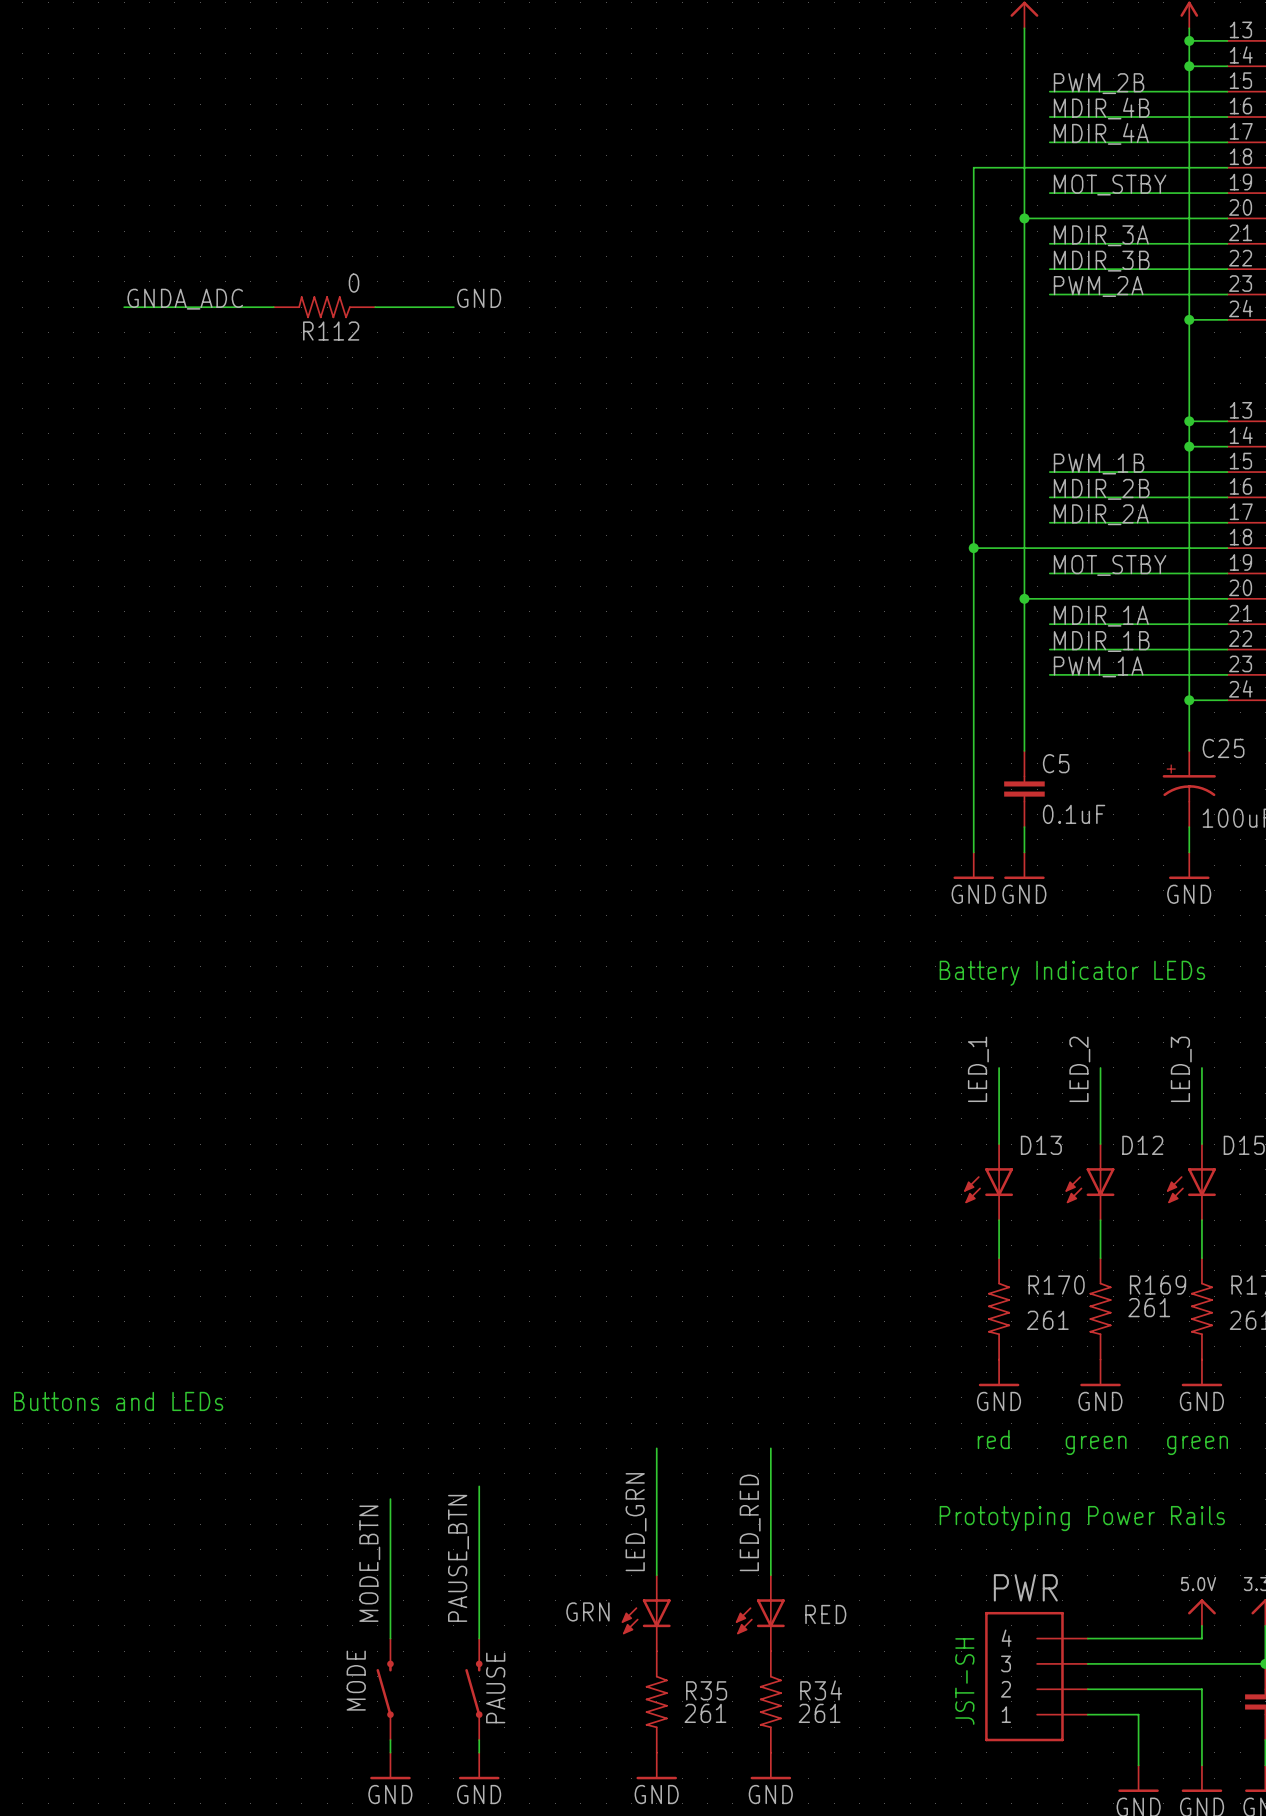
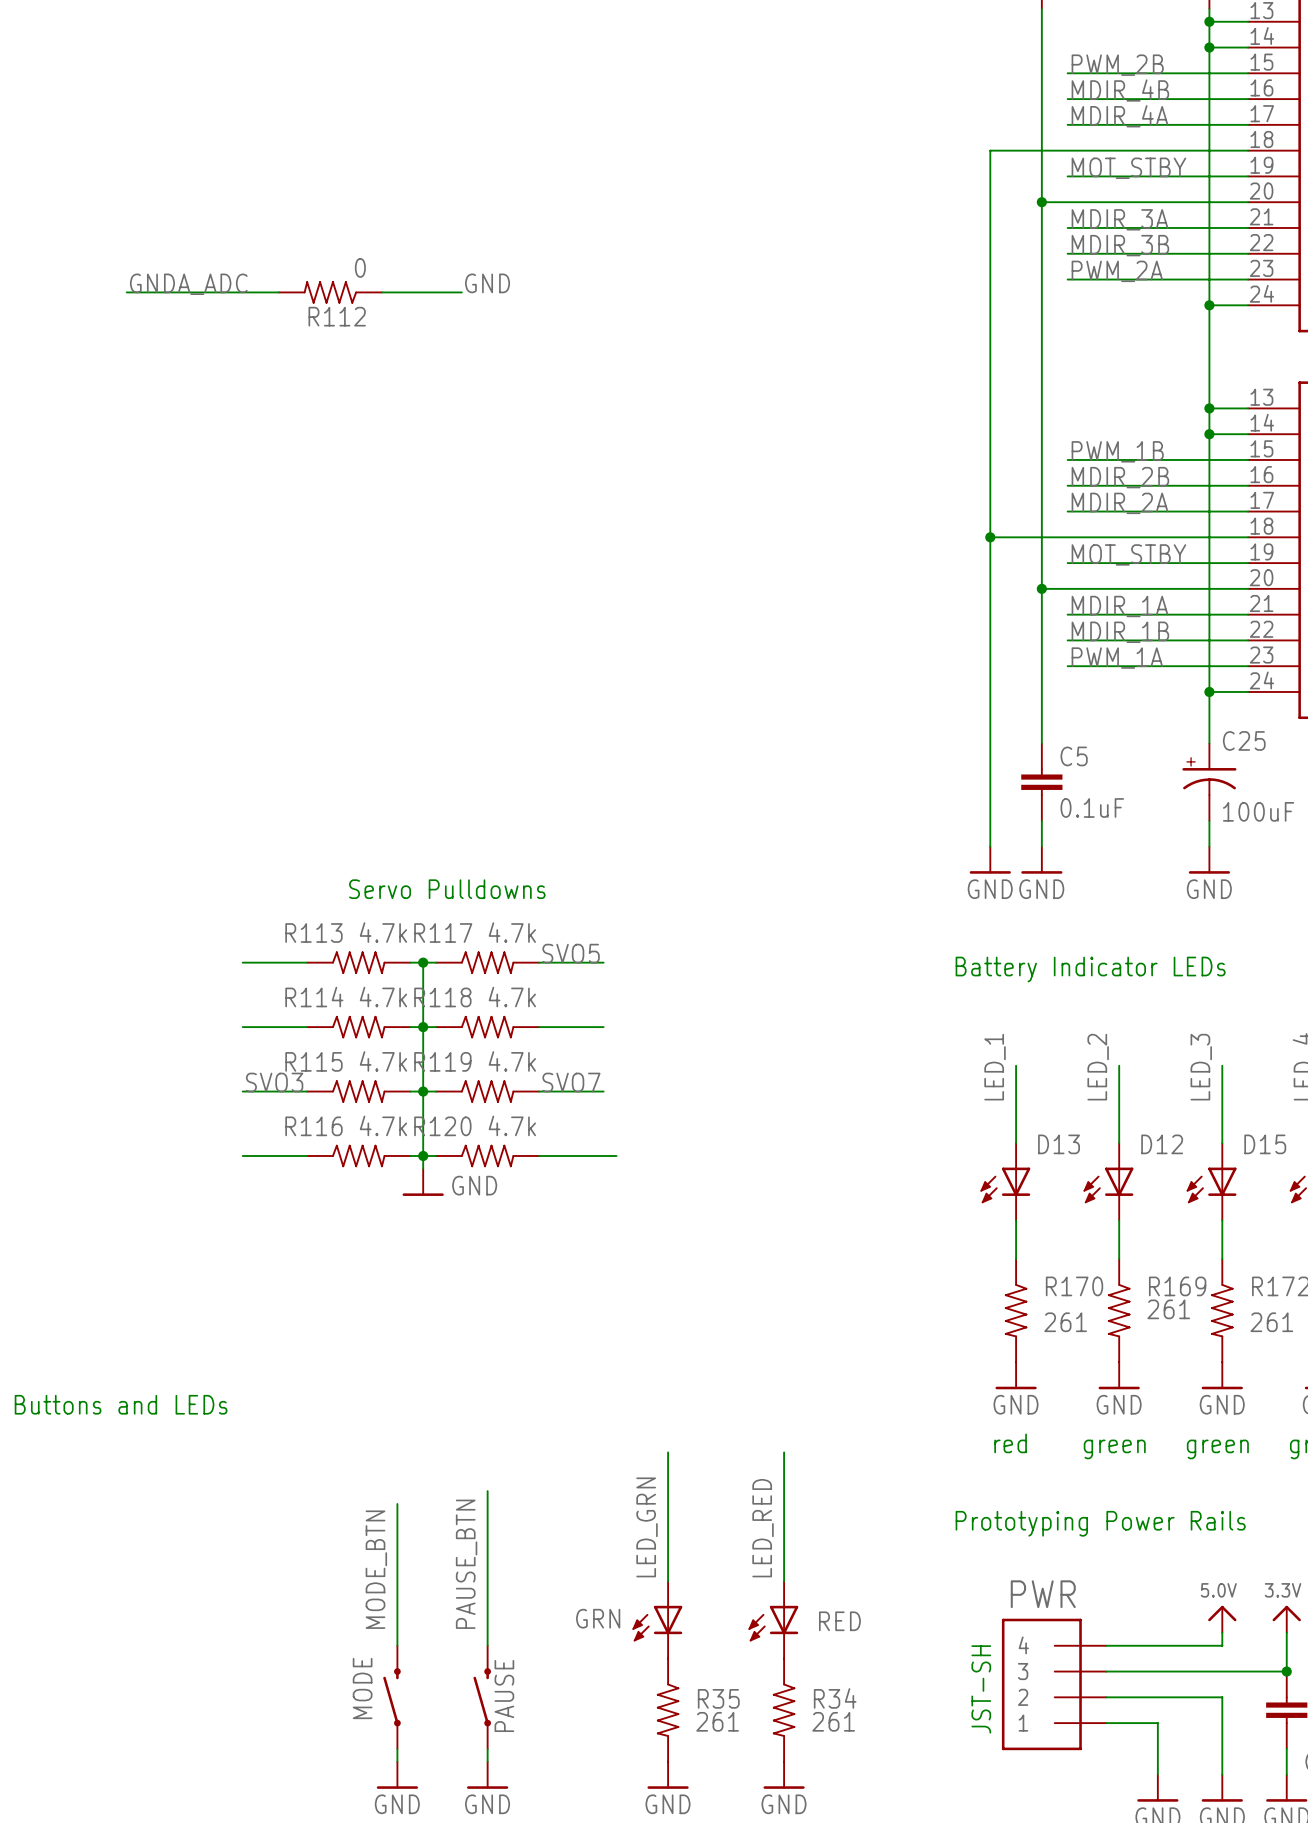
text: none -> Servo Pulldowns (447, 889)
label: none -> SVO5 (571, 953)
wire: none -> (242, 962) (307, 962)
R113: none -> 4.7k (358, 962)
wire: none -> (410, 962) (436, 962)
wire: none -> (423, 962) (423, 1168)
junction: none -> (423, 962)
R117: none -> 4.7k (487, 962)
wire: none -> (539, 962) (603, 962)
wire: none -> (242, 1027) (307, 1027)
R114: none -> 4.7k (358, 1027)
wire: none -> (410, 1027) (436, 1027)
junction: none -> (423, 1027)
R118: none -> 4.7k (487, 1027)
wire: none -> (539, 1027) (603, 1027)
label: none -> SVO3 (274, 1082)
label: none -> SVO7 (571, 1082)
wire: none -> (242, 1091) (307, 1091)
R115: none -> 4.7k (358, 1091)
wire: none -> (410, 1091) (436, 1091)
junction: none -> (423, 1091)
R119: none -> 4.7k (487, 1091)
wire: none -> (539, 1091) (603, 1091)
wire: none -> (242, 1155) (307, 1155)
R116: none -> 4.7k (358, 1155)
wire: none -> (410, 1155) (436, 1155)
junction: none -> (423, 1155)
R120: none -> 4.7k (487, 1155)
wire: none -> (539, 1155) (616, 1155)
power symbol: none -> GND (423, 1182)

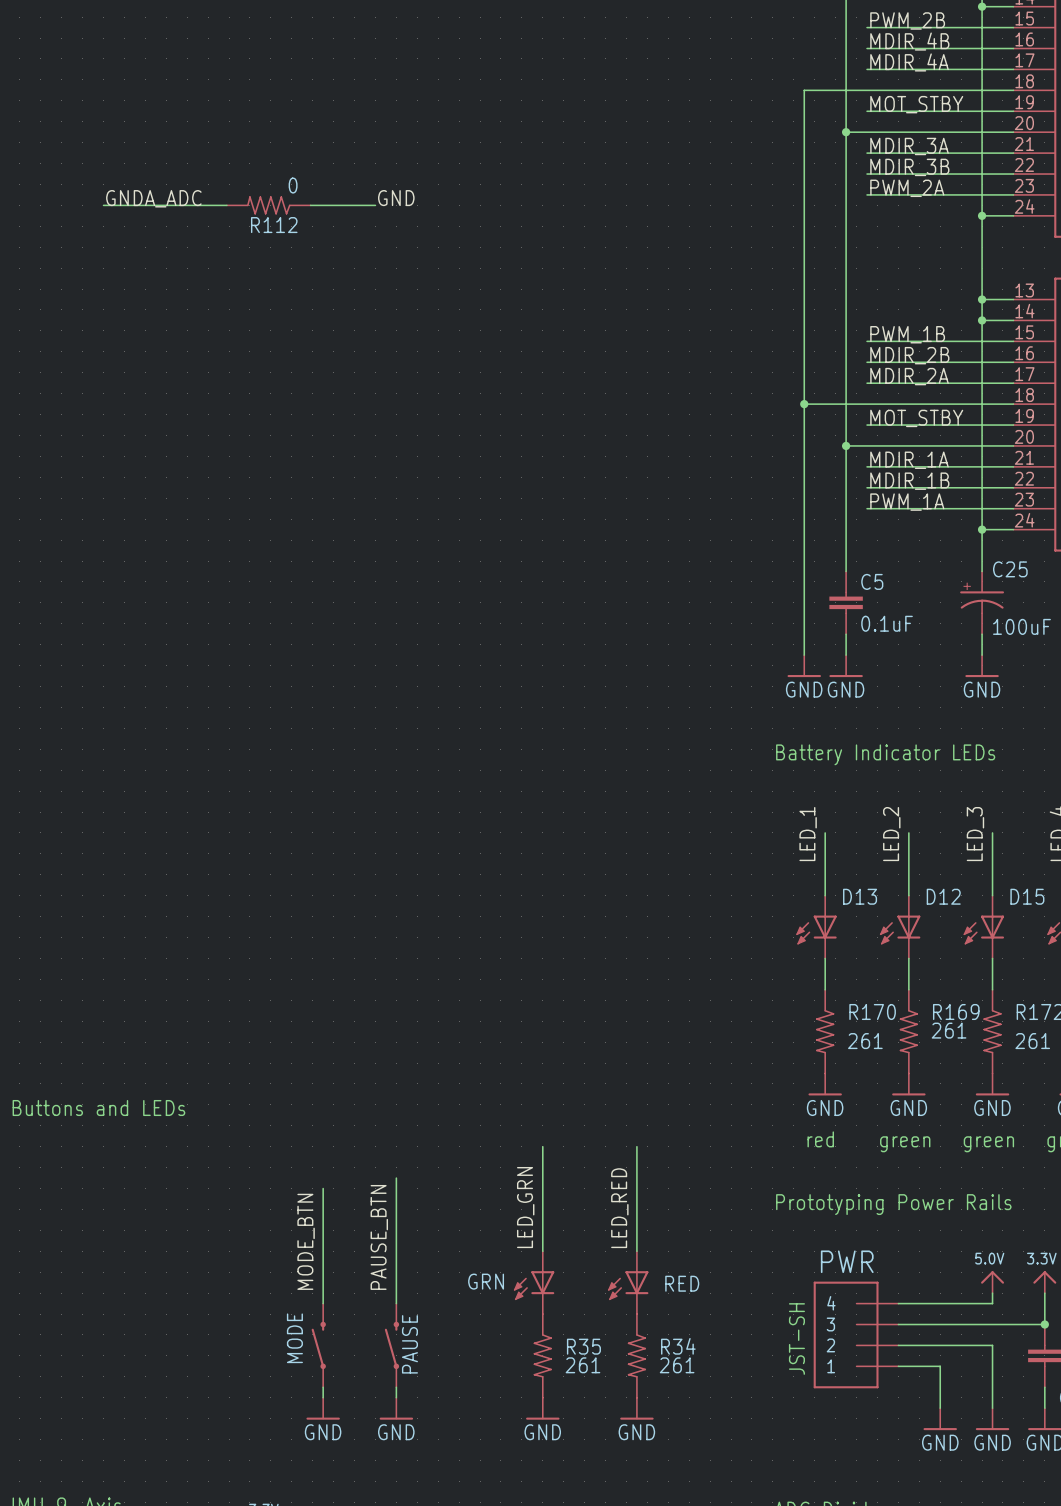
text: Servo Pulldowns (447, 889) -> none
label: SVO5 (571, 953) -> none
wire: (242, 962) (307, 962) -> none
R113: 4.7k (358, 962) -> none
wire: (410, 962) (436, 962) -> none
wire: (423, 962) (423, 1168) -> none
junction: (423, 962) -> none
R117: 4.7k (487, 962) -> none
wire: (539, 962) (603, 962) -> none
wire: (242, 1027) (307, 1027) -> none
R114: 4.7k (358, 1027) -> none
wire: (410, 1027) (436, 1027) -> none
junction: (423, 1027) -> none
R118: 4.7k (487, 1027) -> none
wire: (539, 1027) (603, 1027) -> none
label: SVO3 (274, 1082) -> none
label: SVO7 (571, 1082) -> none
wire: (242, 1091) (307, 1091) -> none
R115: 4.7k (358, 1091) -> none
wire: (410, 1091) (436, 1091) -> none
junction: (423, 1091) -> none
R119: 4.7k (487, 1091) -> none
wire: (539, 1091) (603, 1091) -> none
wire: (242, 1155) (307, 1155) -> none
R116: 4.7k (358, 1155) -> none
wire: (410, 1155) (436, 1155) -> none
junction: (423, 1155) -> none
R120: 4.7k (487, 1155) -> none
wire: (539, 1155) (616, 1155) -> none
power symbol: GND (423, 1182) -> none

